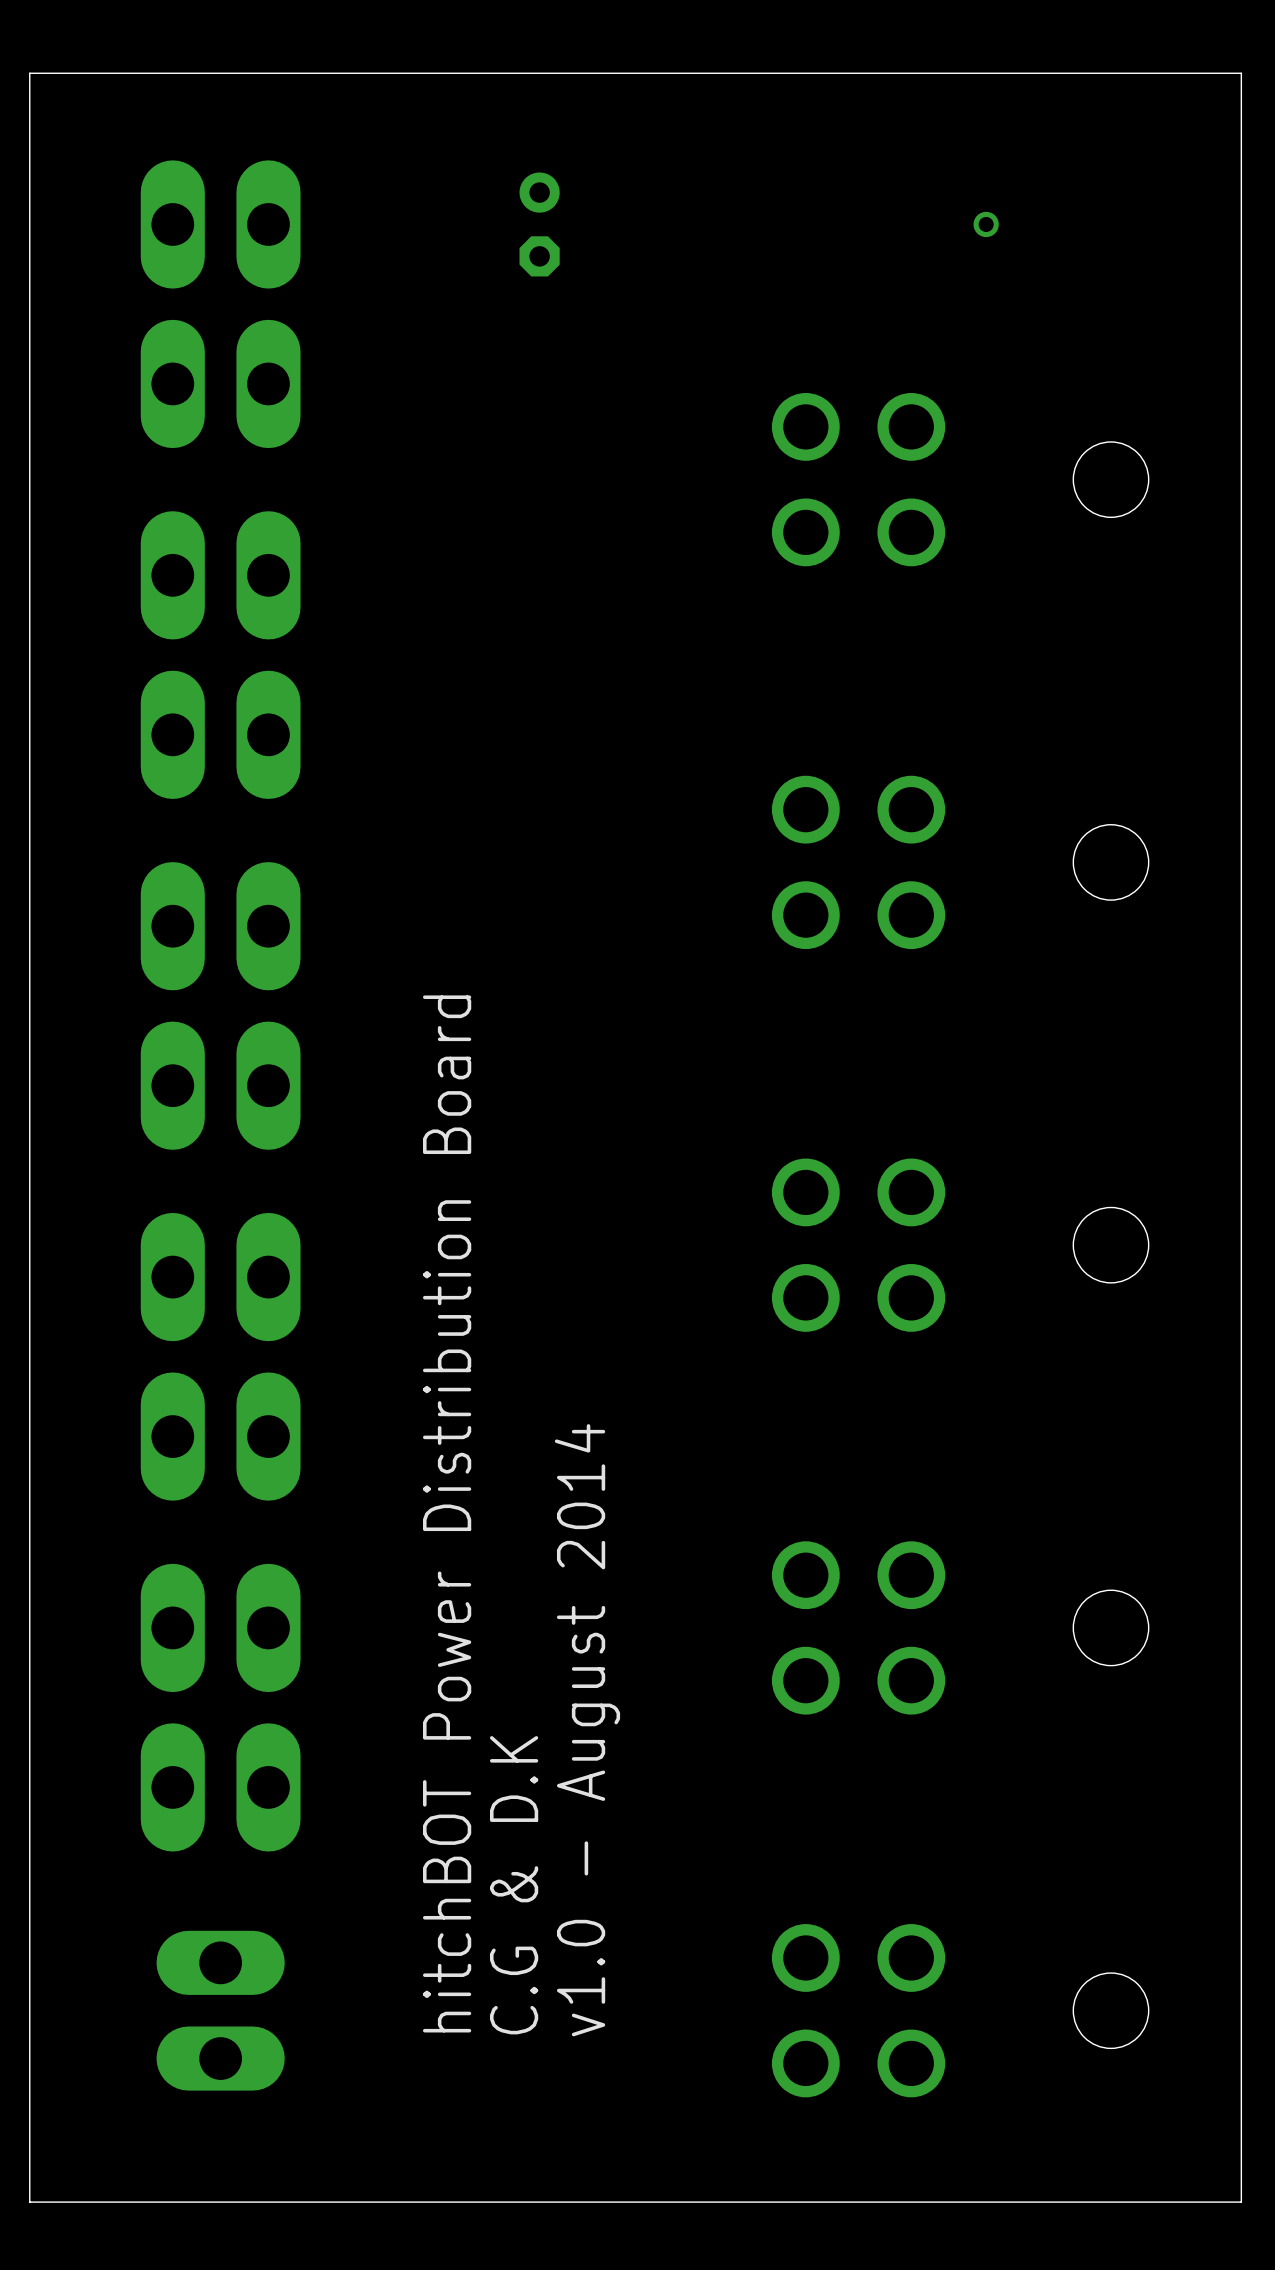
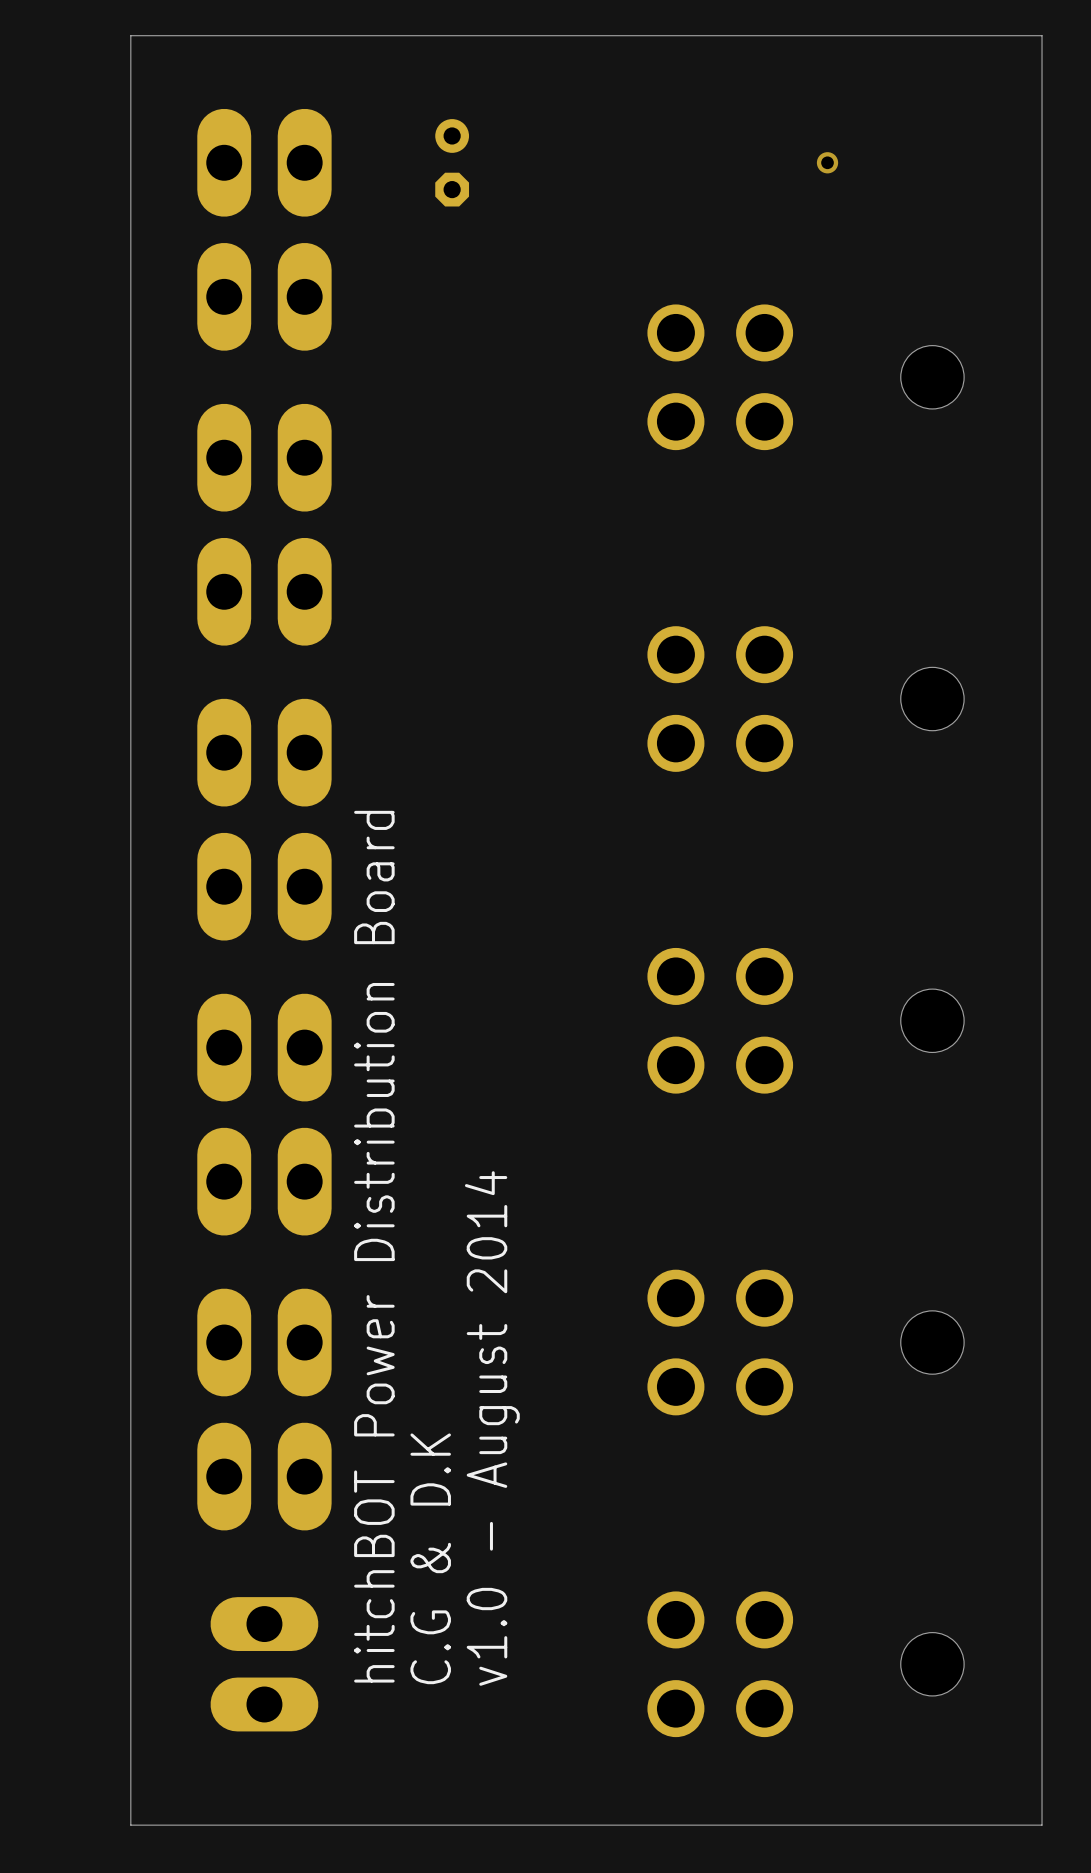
board edge: (157, 73) (29, 73) (29, 2202) (157, 2202) -> (130, 35) (130, 1825)
part: (220, 224) -> none
part: none -> (264, 162)
part: (220, 383) -> none
part: none -> (264, 296)
part: (220, 575) -> none
part: none -> (264, 457)
part: (220, 734) -> none
part: none -> (264, 591)
part: (220, 926) -> none
part: none -> (264, 752)
part: (220, 1085) -> none
part: none -> (264, 886)
part: (220, 1277) -> none
part: none -> (264, 1047)
part: (220, 1436) -> none
part: none -> (264, 1181)
part: (220, 1627) -> none
part: none -> (264, 1342)
part: (220, 1787) -> none
part: none -> (264, 1476)
part position: (220, 2010) -> (264, 1664)

